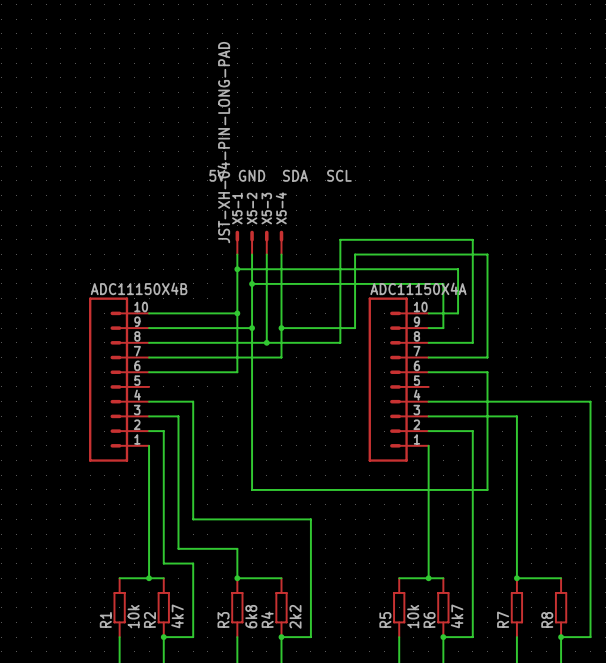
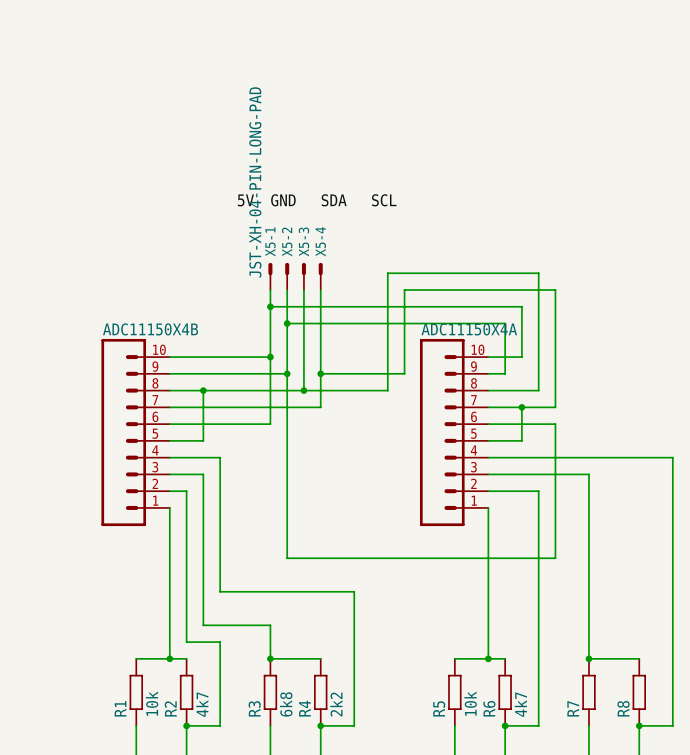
wire: none -> (203, 390) (203, 440) (169, 440)
junction: none -> (203, 390)
wire: none -> (521, 407) (521, 440) (488, 440)
junction: none -> (521, 407)

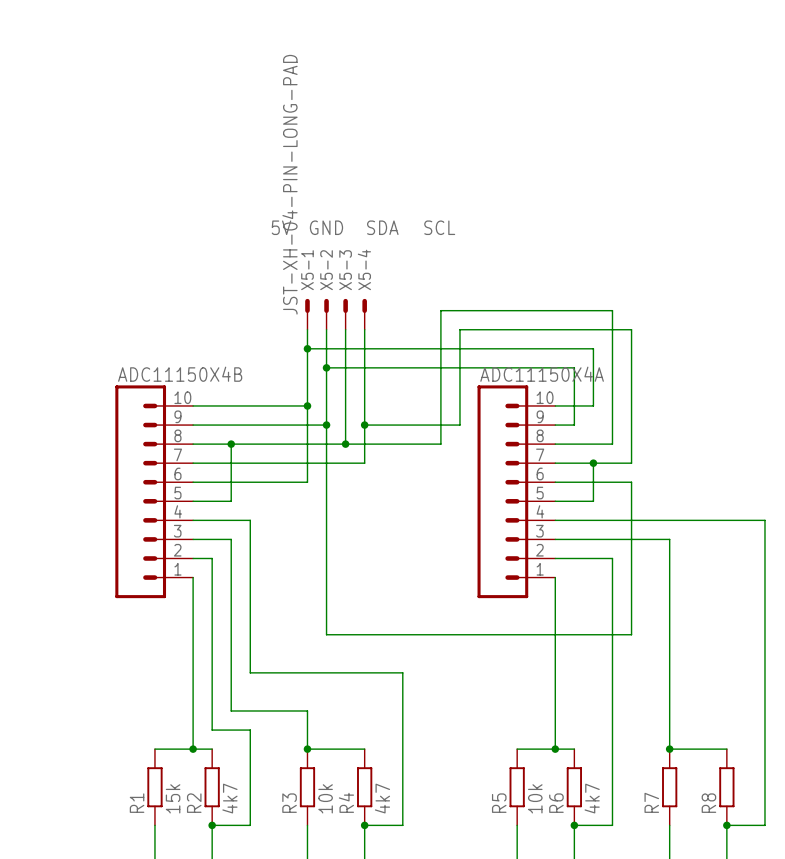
R1 value: 10k (152, 703) -> 15k (173, 798)
R3 value: 6k8 (286, 704) -> 10k (325, 798)
R4 value: 2k2 (336, 704) -> 4k7 (382, 798)

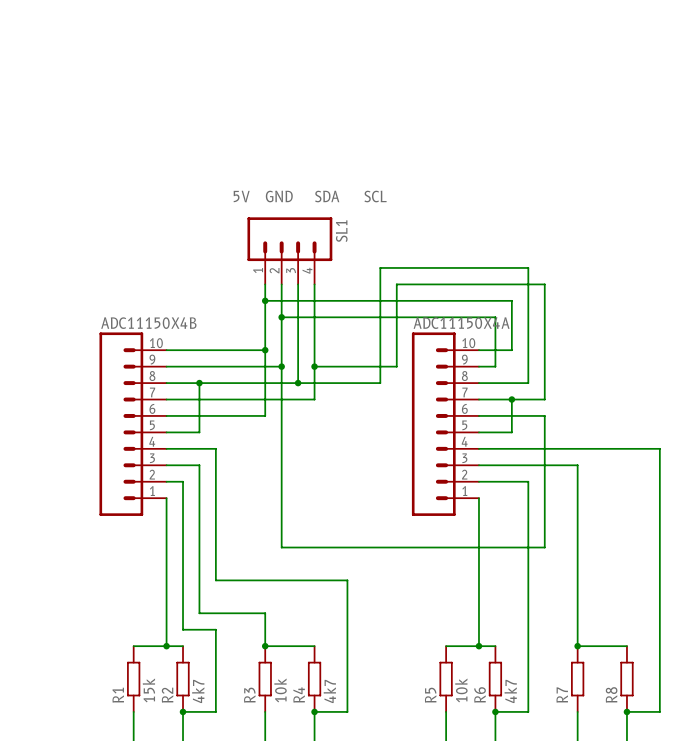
SL1: none -> (289, 250)
X5-1: JST-XH-04-PIN-LONG-PAD (307, 314) -> none
X5-2: (326, 314) -> none
X5-3: (345, 314) -> none
X5-4: (364, 314) -> none

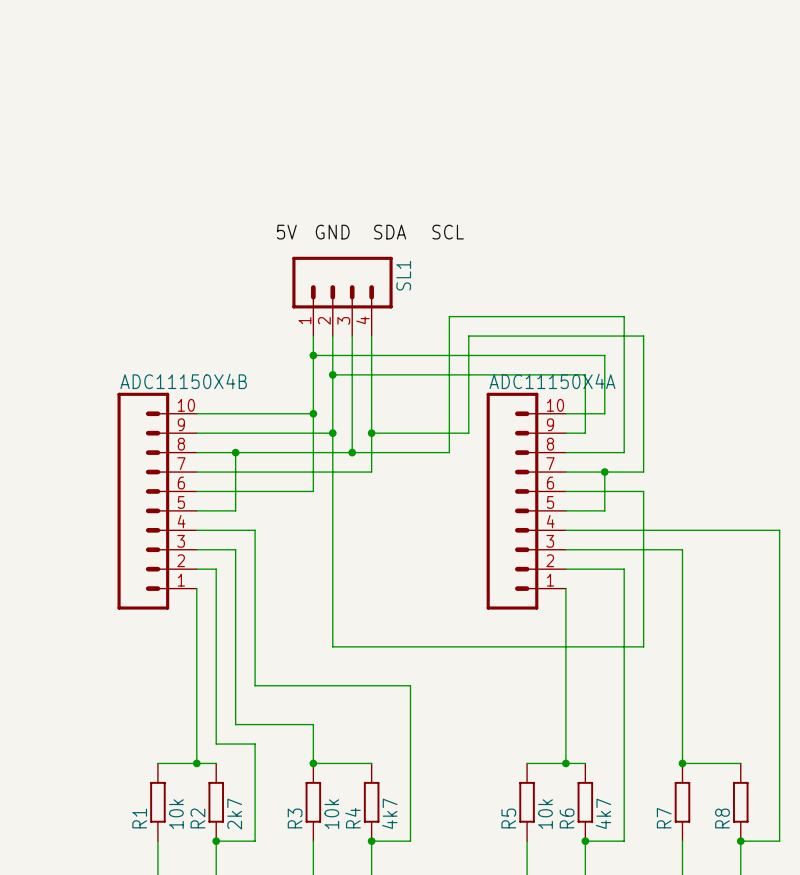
R1 value: 15k (148, 690) -> 10k (176, 814)
R2 value: 4k7 (198, 691) -> 2k7 (234, 814)

